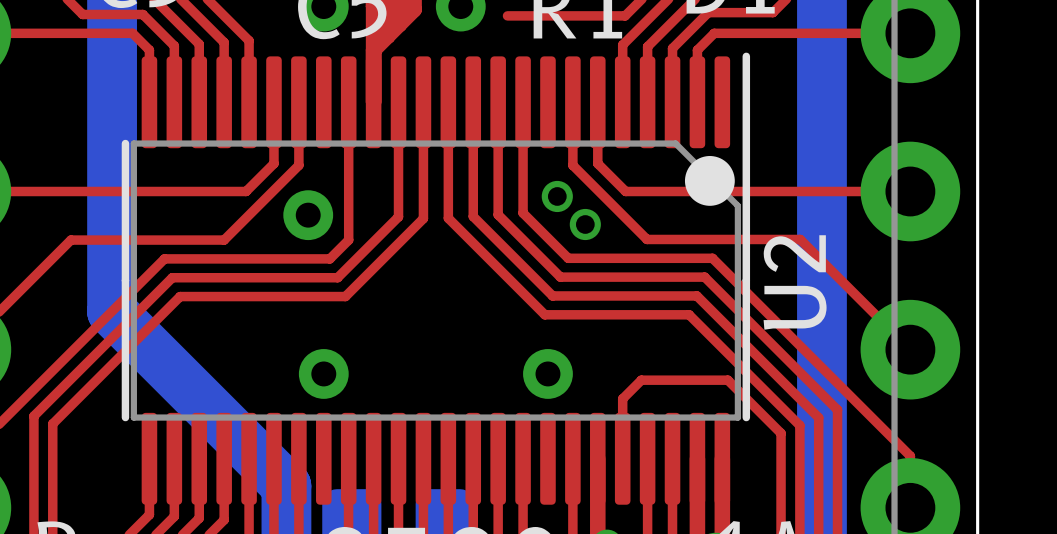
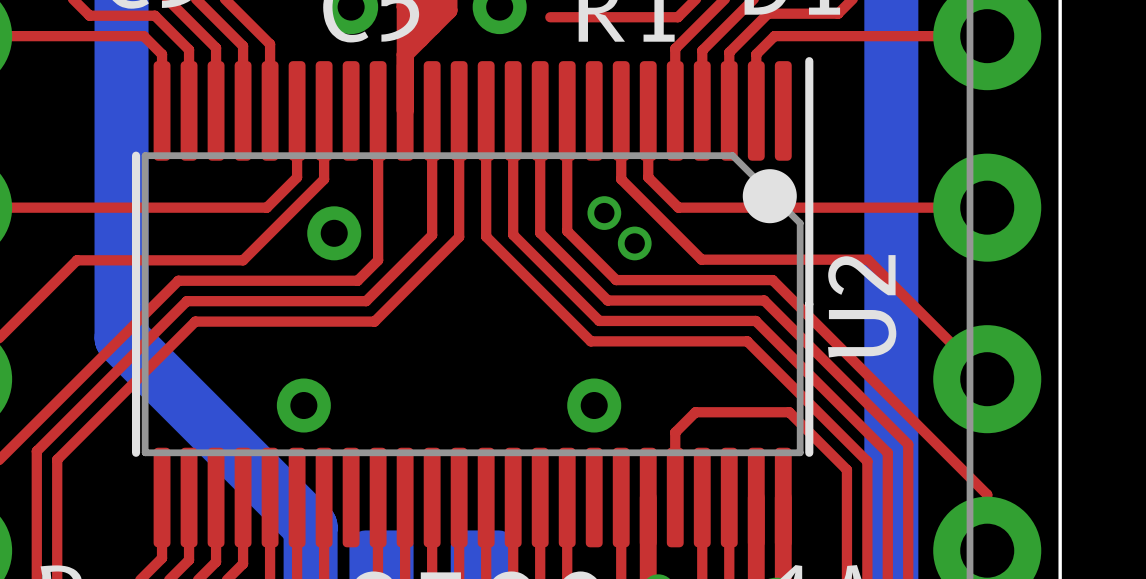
via position: (323, 373) -> (303, 405)

